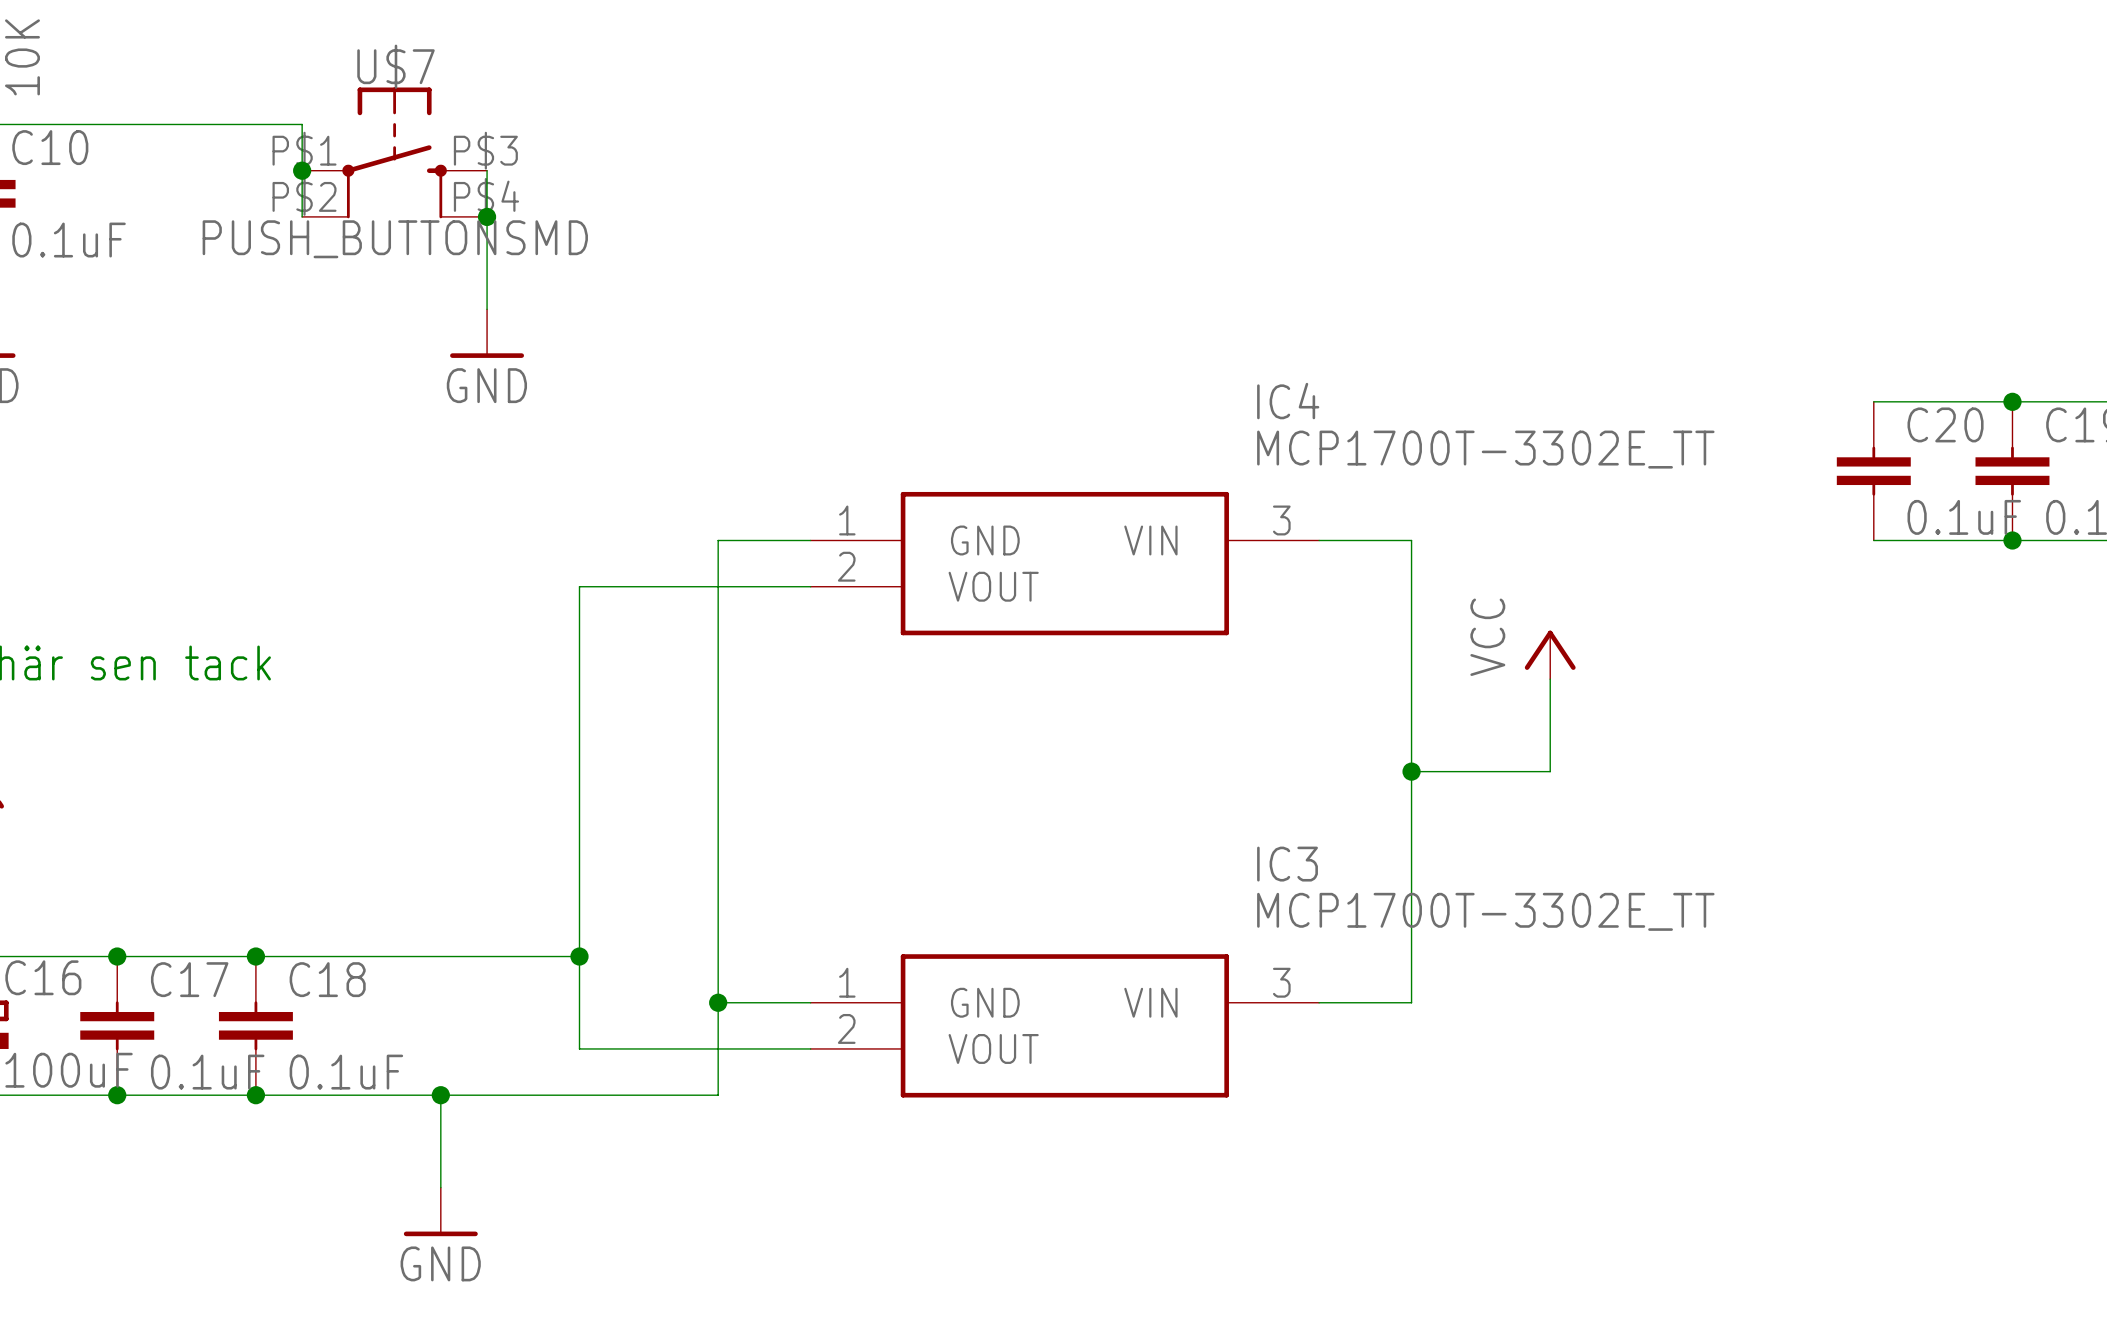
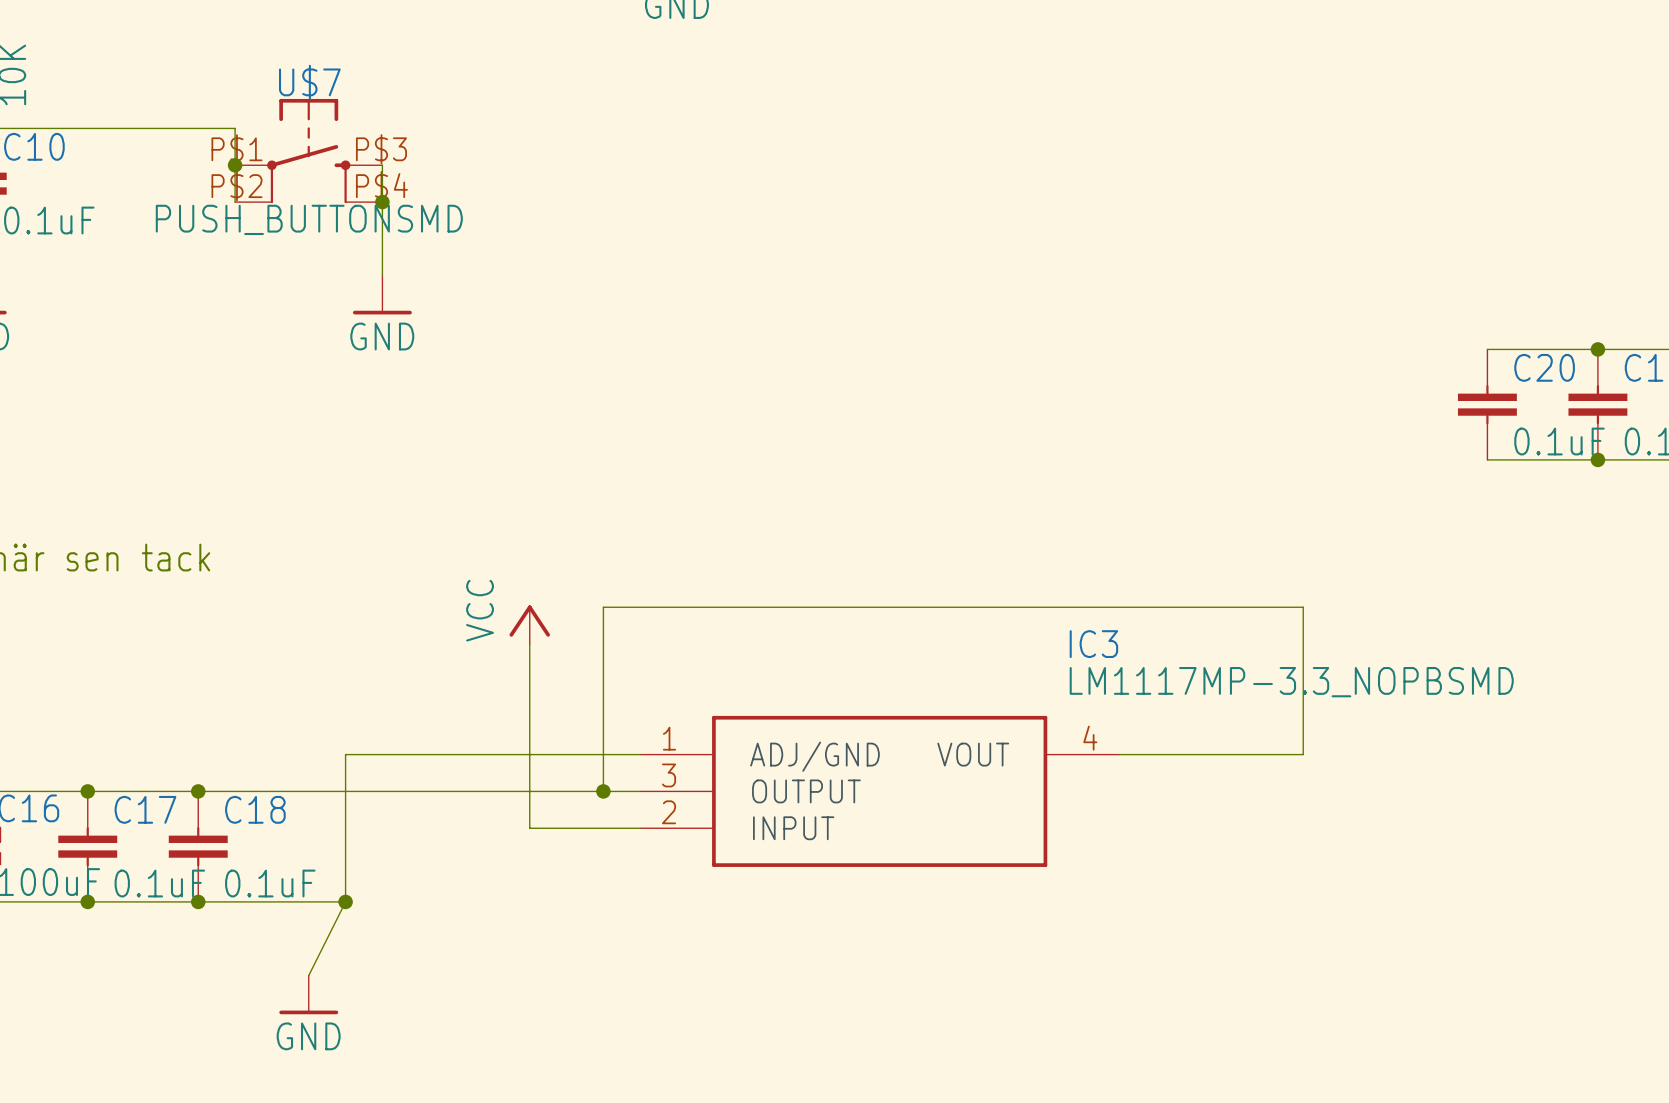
wire: (810, 540) (718, 540) (718, 1095) (440, 1095) (440, 1187) -> none
wire: (1319, 540) (1411, 540) (1411, 1002) (1319, 1002) -> none
IC4: MCP1700T-3302E_TT (1064, 563) -> none
wire: (810, 586) (579, 586) (579, 1048) (810, 1048) -> none
power symbol: VCC (1550, 654) -> none
wire: (1550, 679) (1550, 771) (1411, 771) -> none
power symbol: none -> VCC (529, 624)
wire: none -> (529, 644) (529, 828) (566, 828)
junction: (1411, 771) -> none
IC3 name position: IC3 (1287, 864) -> IC3 (1093, 644)
wire: none -> (640, 754) (345, 754) (345, 901) (308, 975)
wire: none -> (1119, 754) (1303, 754) (1303, 607) (603, 607) (603, 791)
IC3 value: MCP1700T-3302E_TT (1485, 911) -> LM1117MP-3.3_NOPBSMD (1291, 682)
IC3 symbol: [810, 954, 1320, 1098] -> [640, 715, 1120, 867]
wire: none -> (456, 791) (640, 791)
junction: (579, 956) -> none
junction position: (718, 1002) -> (603, 791)
power symbol position: GND (440, 1211) -> GND (308, 994)

